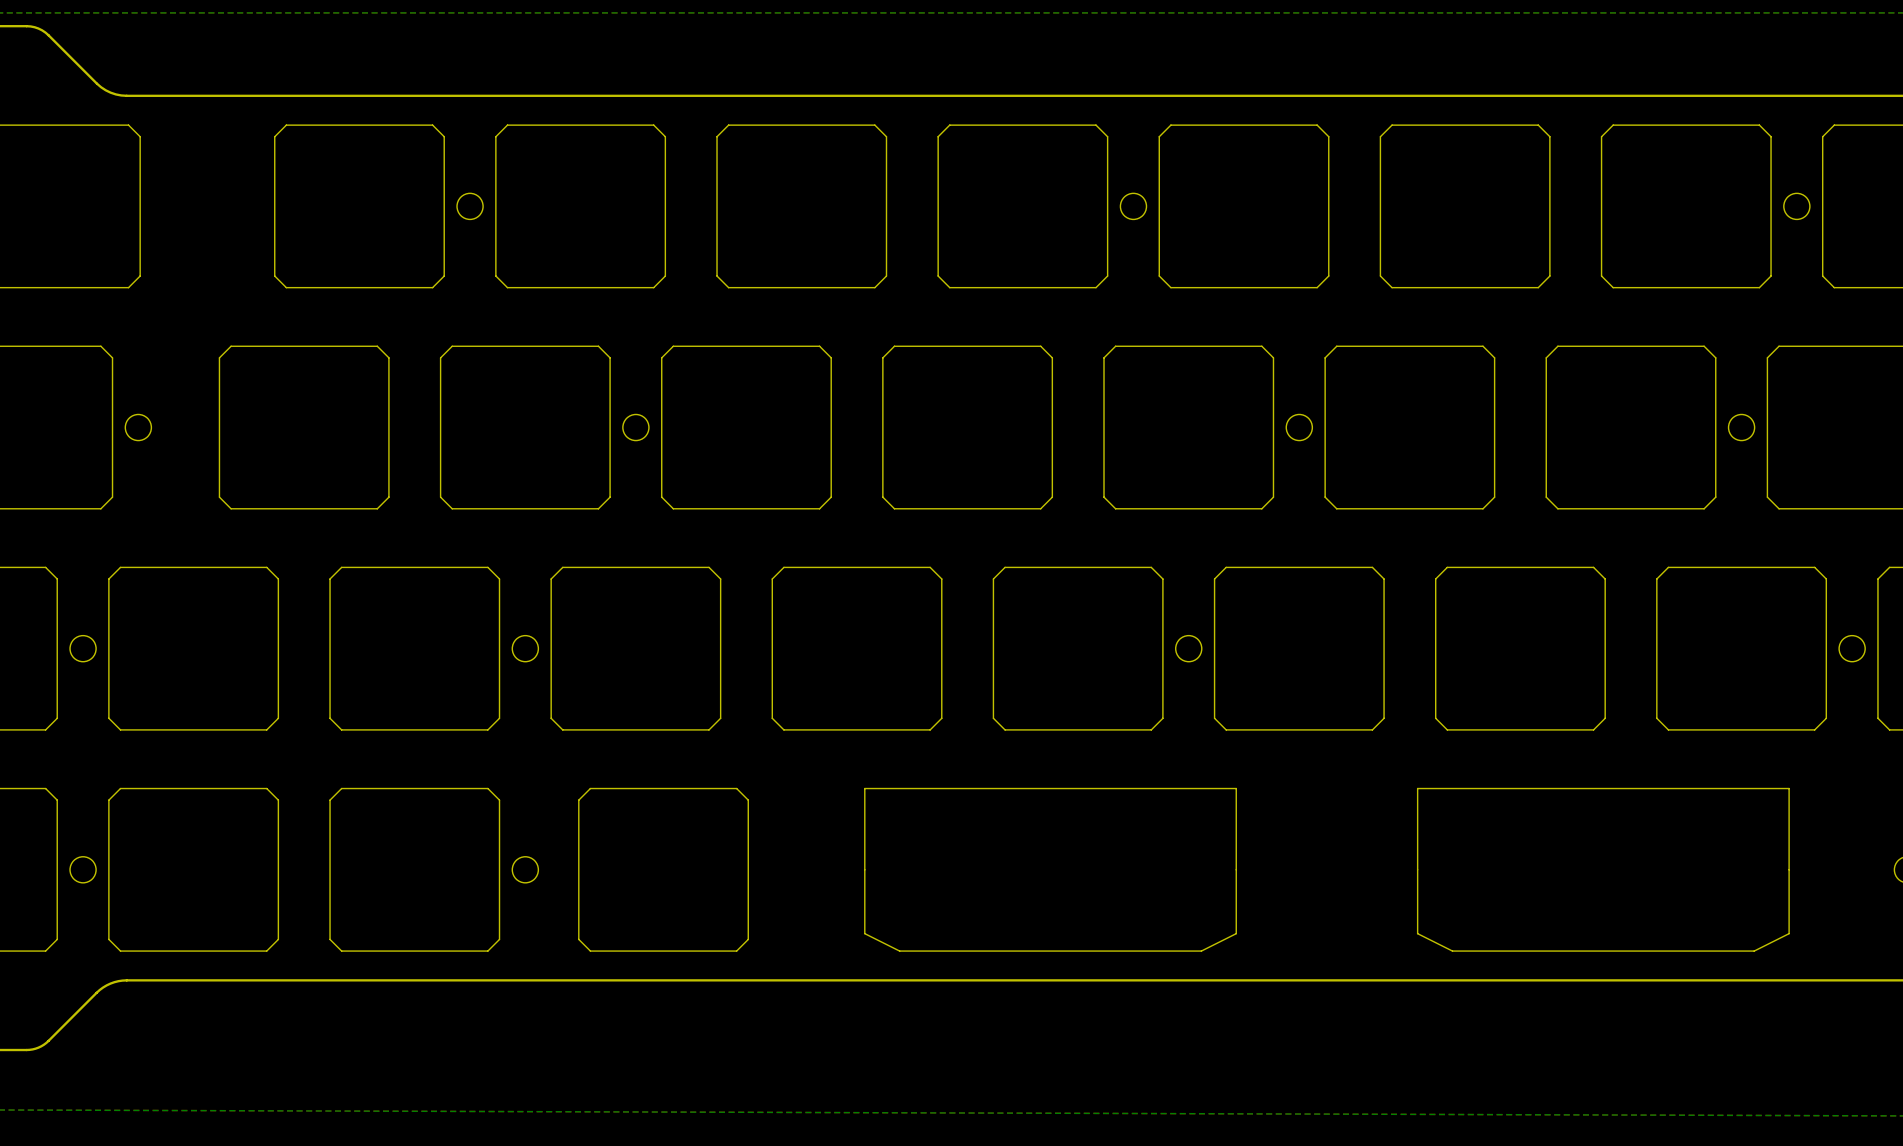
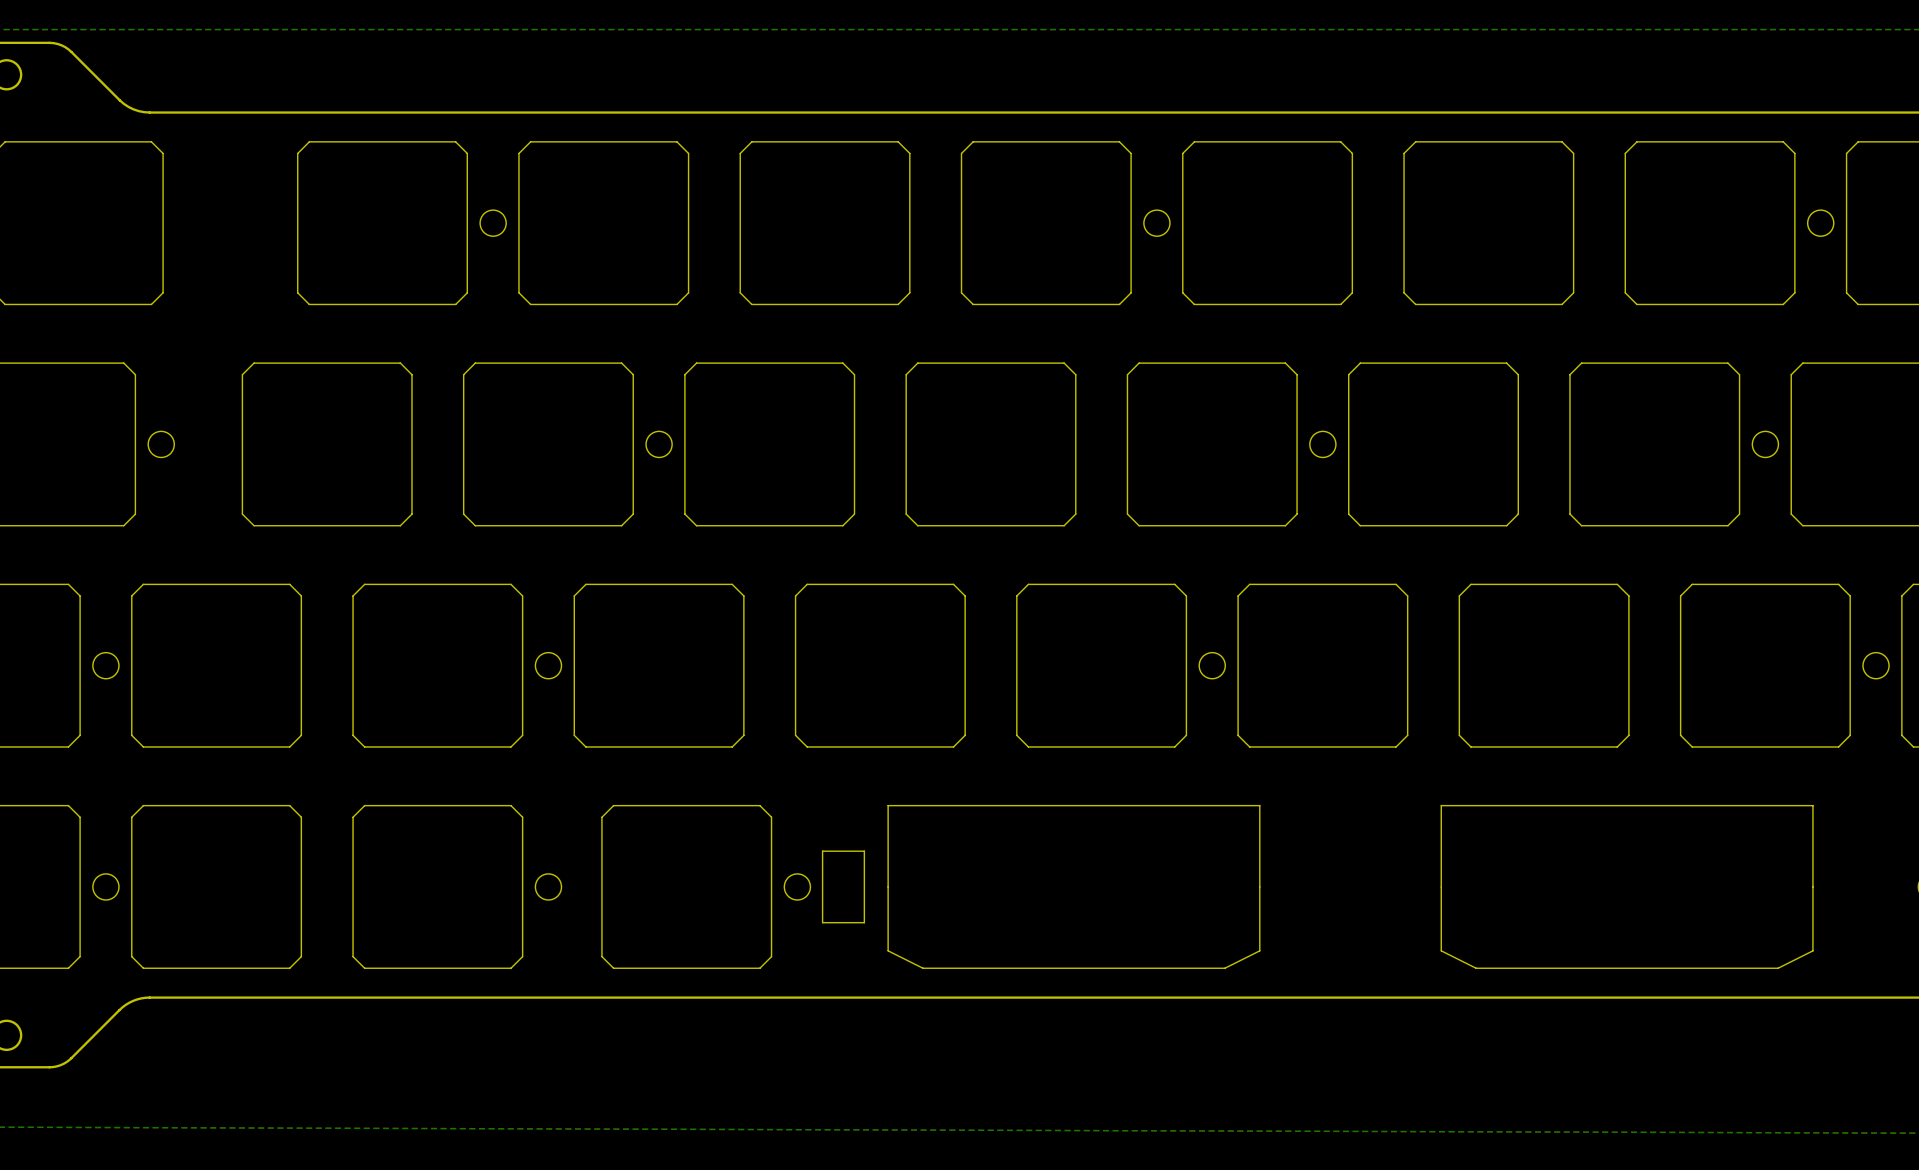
board edge: none -> (864, 851) (822, 851) (822, 922) (864, 922) (864, 851)
round board edge: none -> [783, 873, 811, 901]

